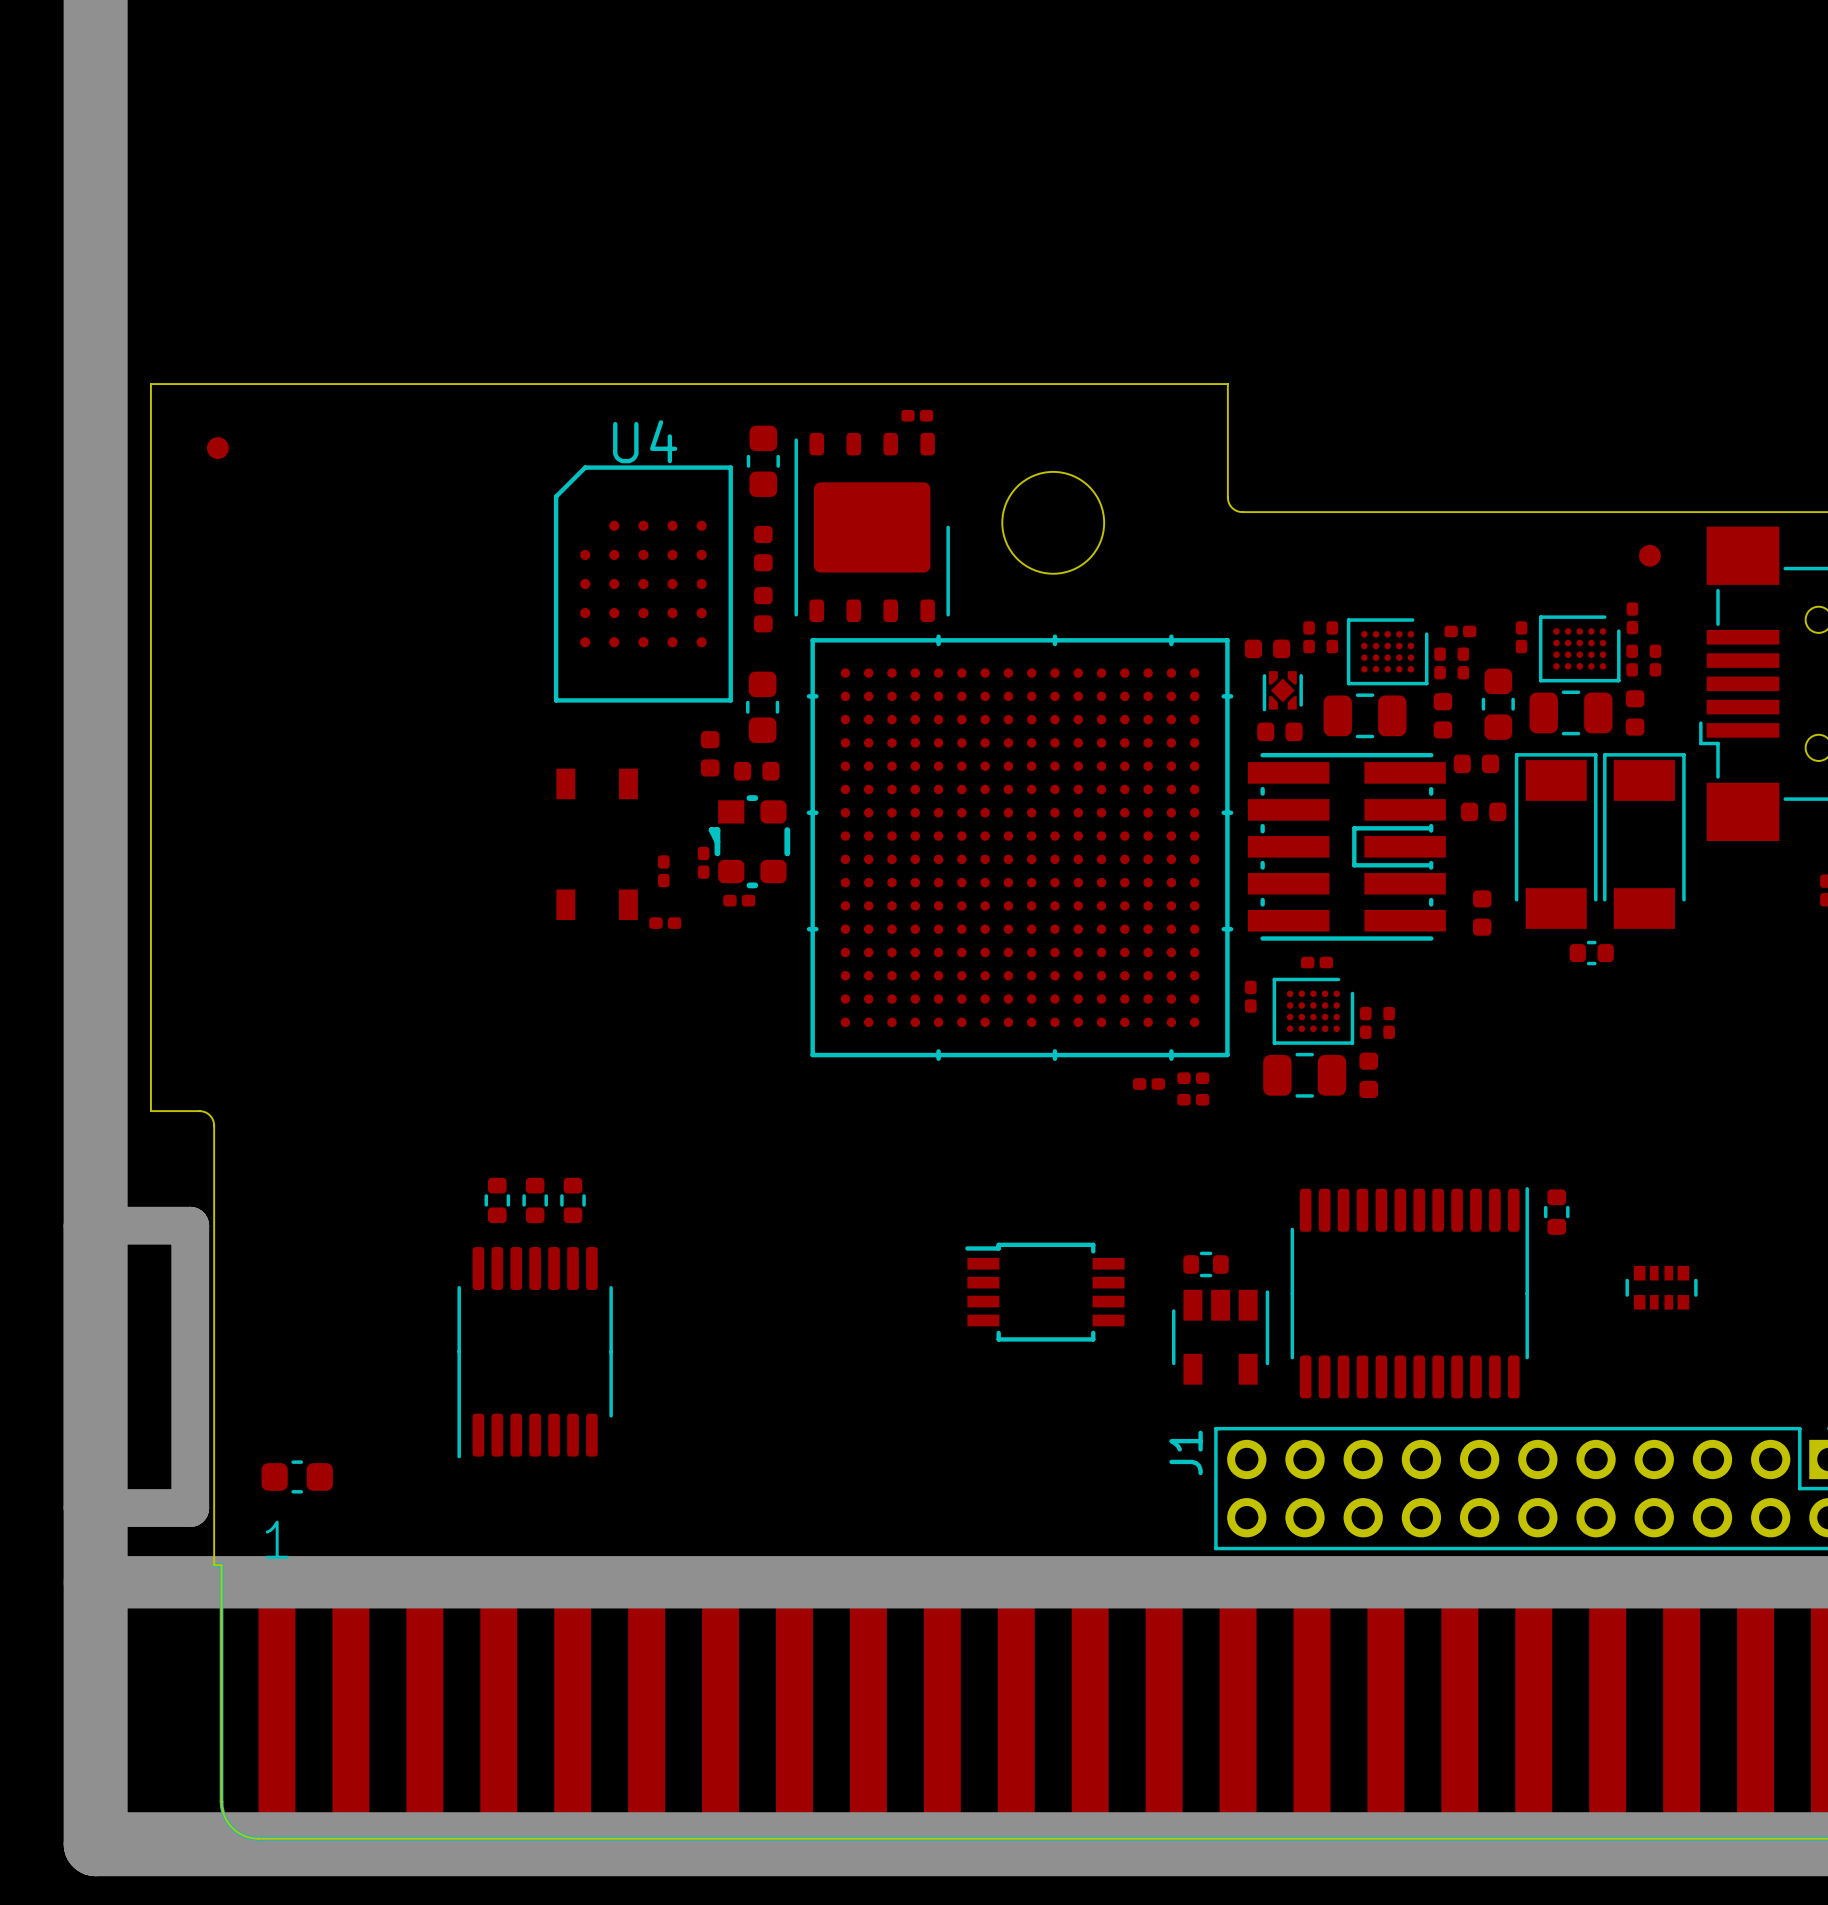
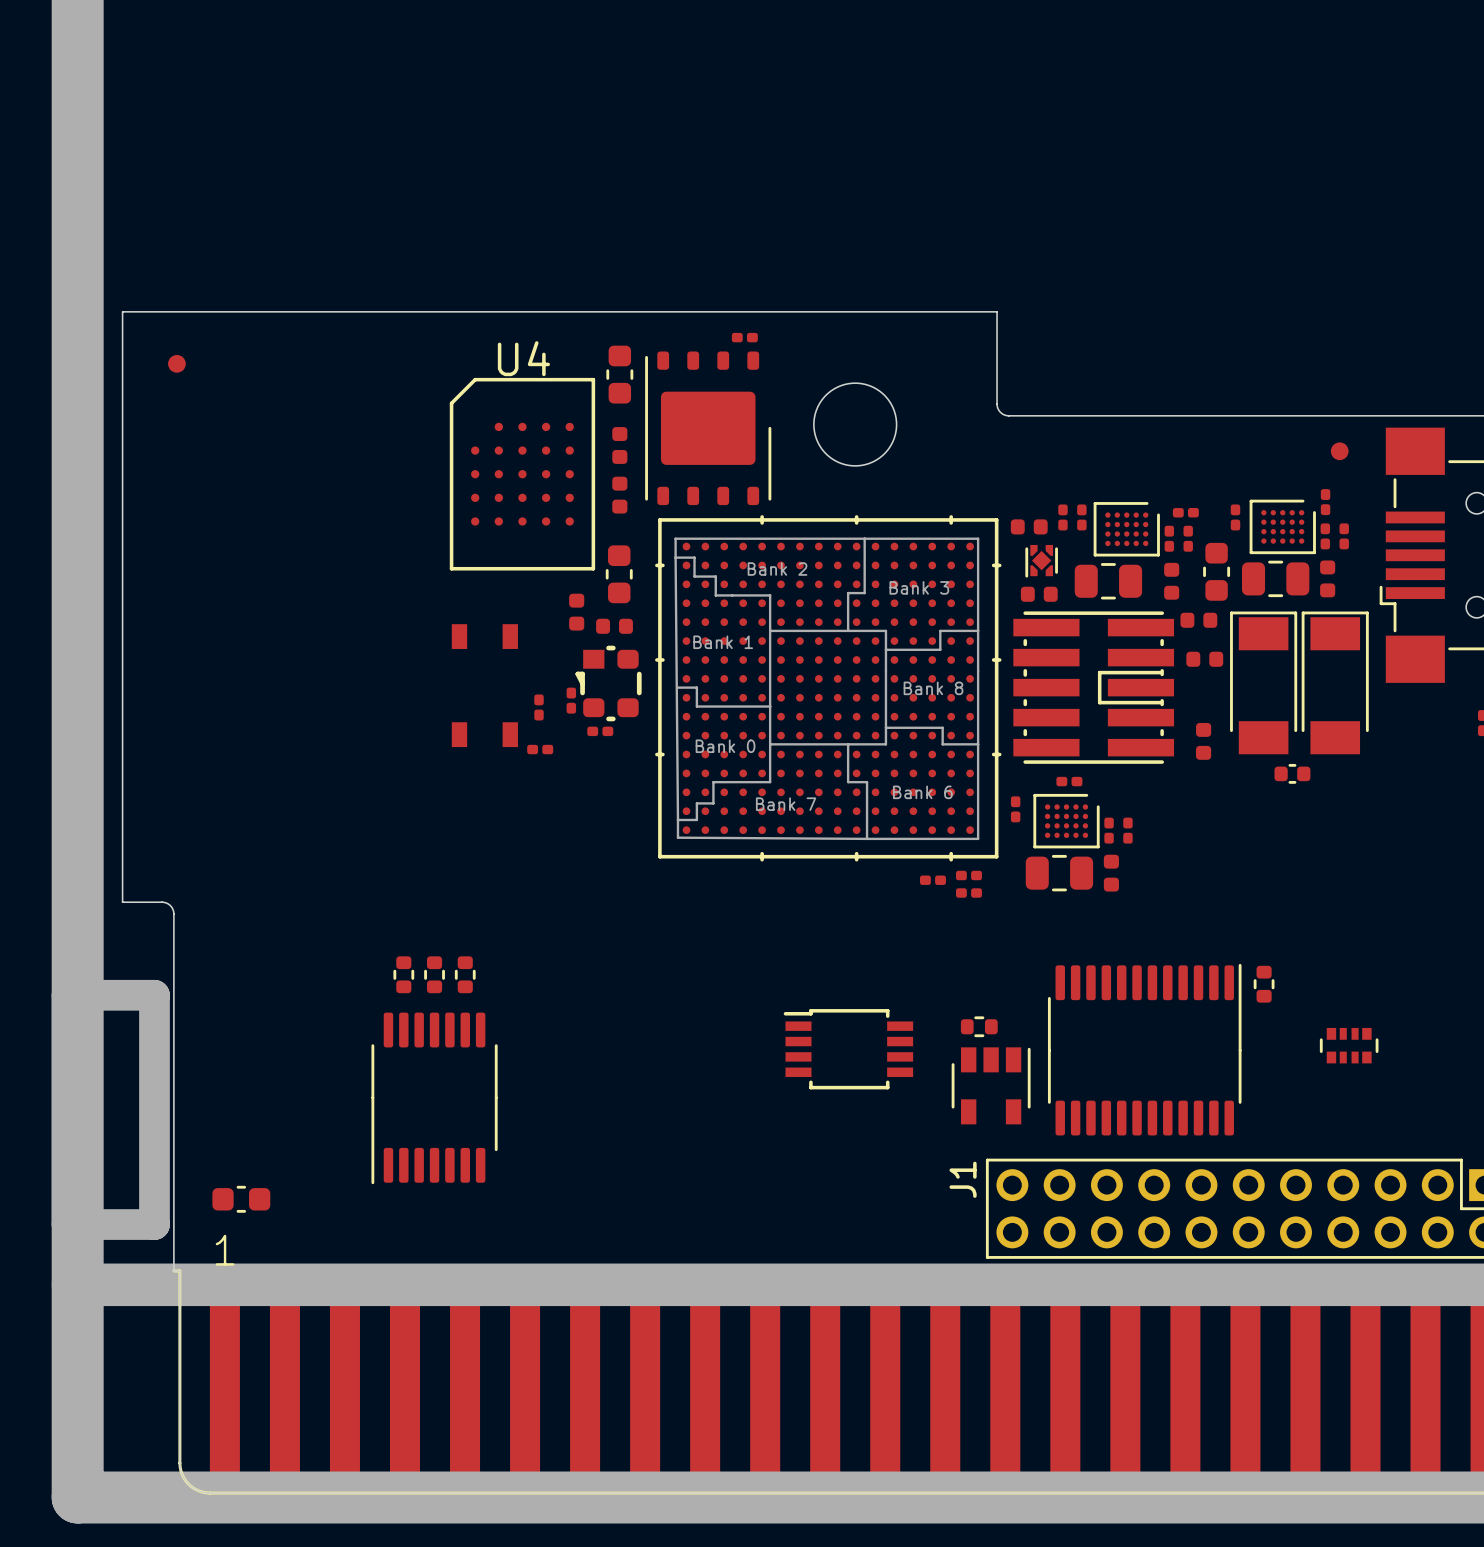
line: none -> (864, 538) (864, 593) (848, 593) (848, 630)
line: none -> (675, 557) (675, 538) (978, 538) (978, 838) (867, 838)
line: none -> (675, 557) (694, 557) (694, 576) (715, 576) (715, 595) (770, 595) (770, 782) (713, 782) (713, 803) (696, 803) (696, 819) (677, 819)
line: none -> (675, 557) (677, 819)
text: none -> Bank 2 (777, 569)
text: none -> Bank 3 (919, 587)
line: none -> (770, 630) (885, 630) (885, 744) (770, 744)
line: none -> (978, 630) (940, 630) (940, 649) (885, 649)
text: none -> Bank 1 (723, 642)
line: none -> (677, 687) (696, 687) (696, 706) (770, 706)
text: none -> Bank 8 (933, 688)
line: none -> (885, 727) (942, 727) (942, 744) (978, 744)
line: none -> (848, 744) (848, 782) (867, 782) (867, 838)
text: none -> Bank 0 (725, 746)
text: none -> Bank 6 (922, 792)
text: none -> Bank 7 (786, 804)
line: none -> (677, 819) (677, 837) (867, 838)

